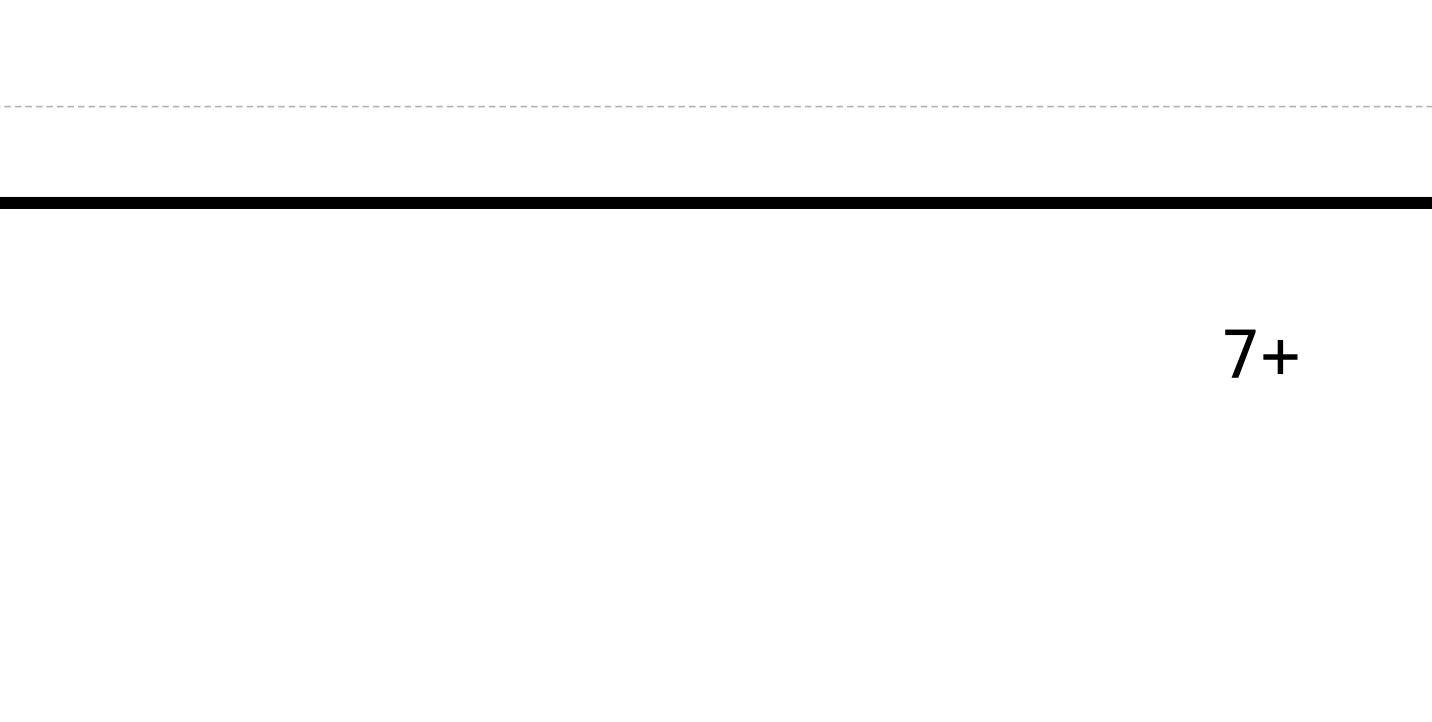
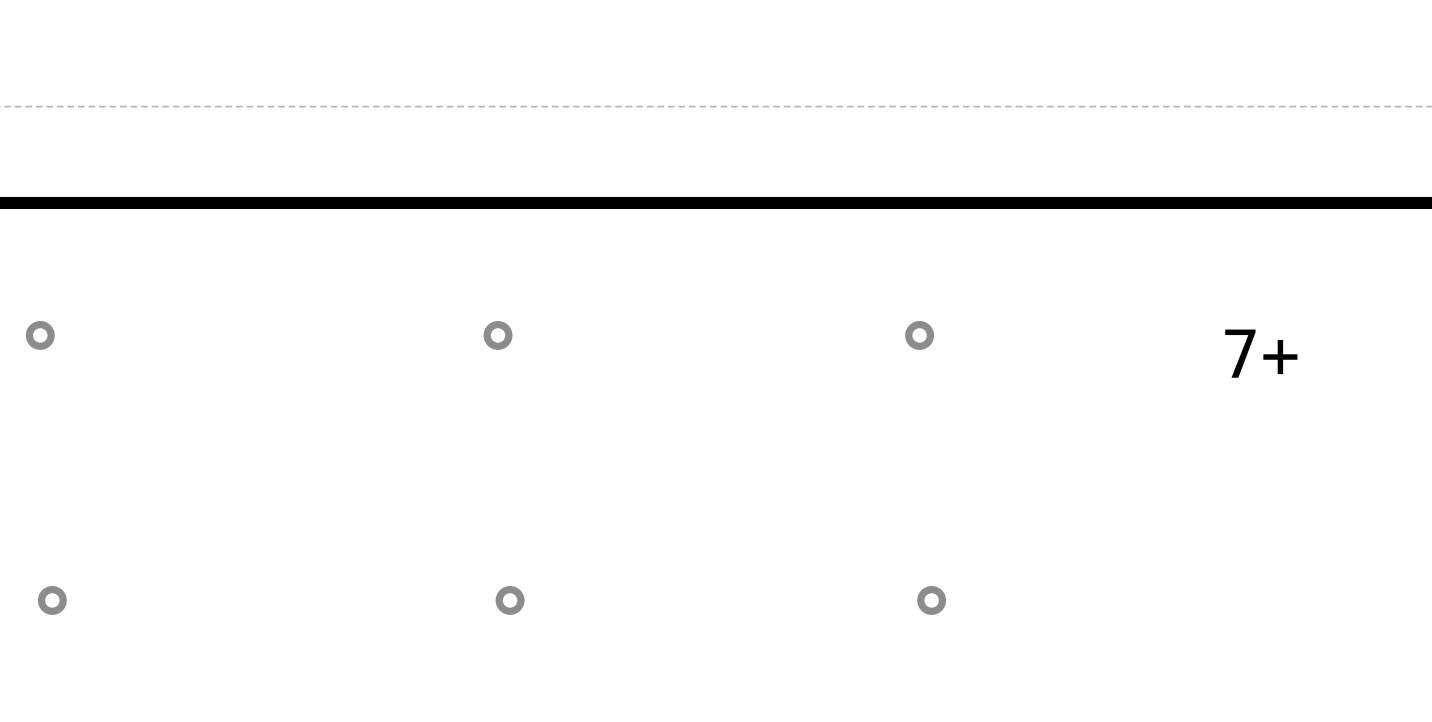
via: none -> (40, 335)
via: none -> (498, 335)
via: none -> (919, 335)
via: none -> (52, 600)
via: none -> (510, 600)
via: none -> (931, 600)

